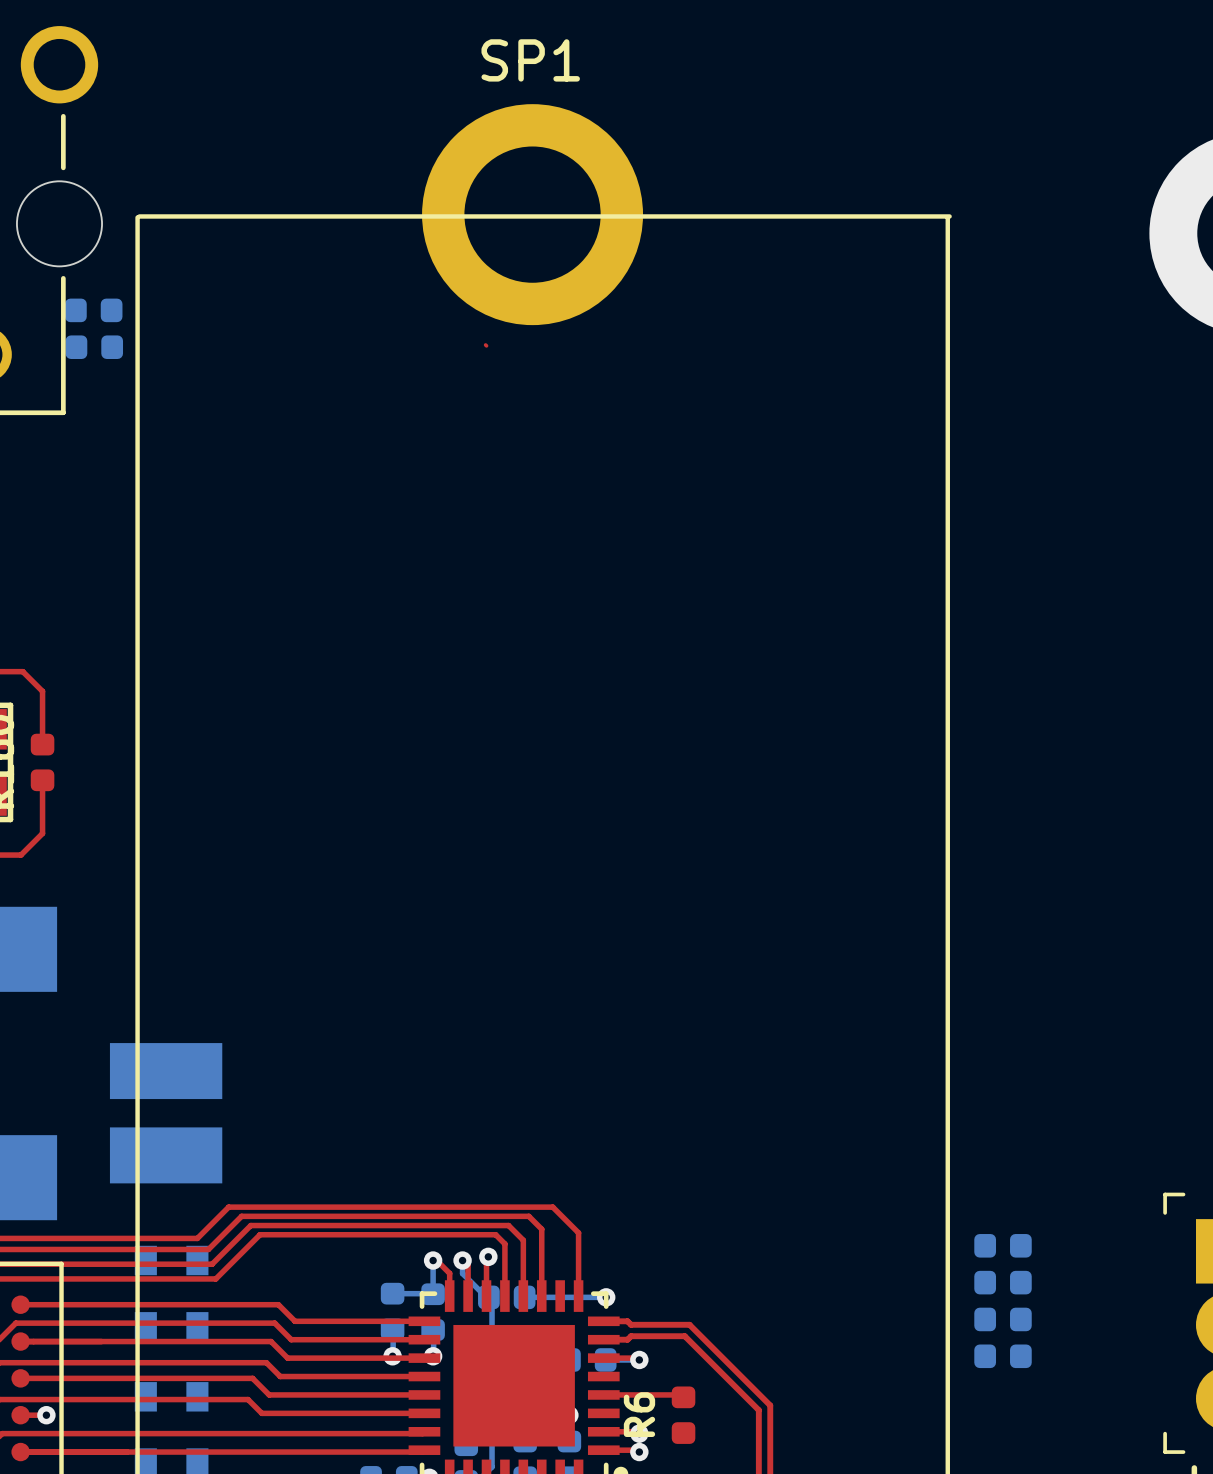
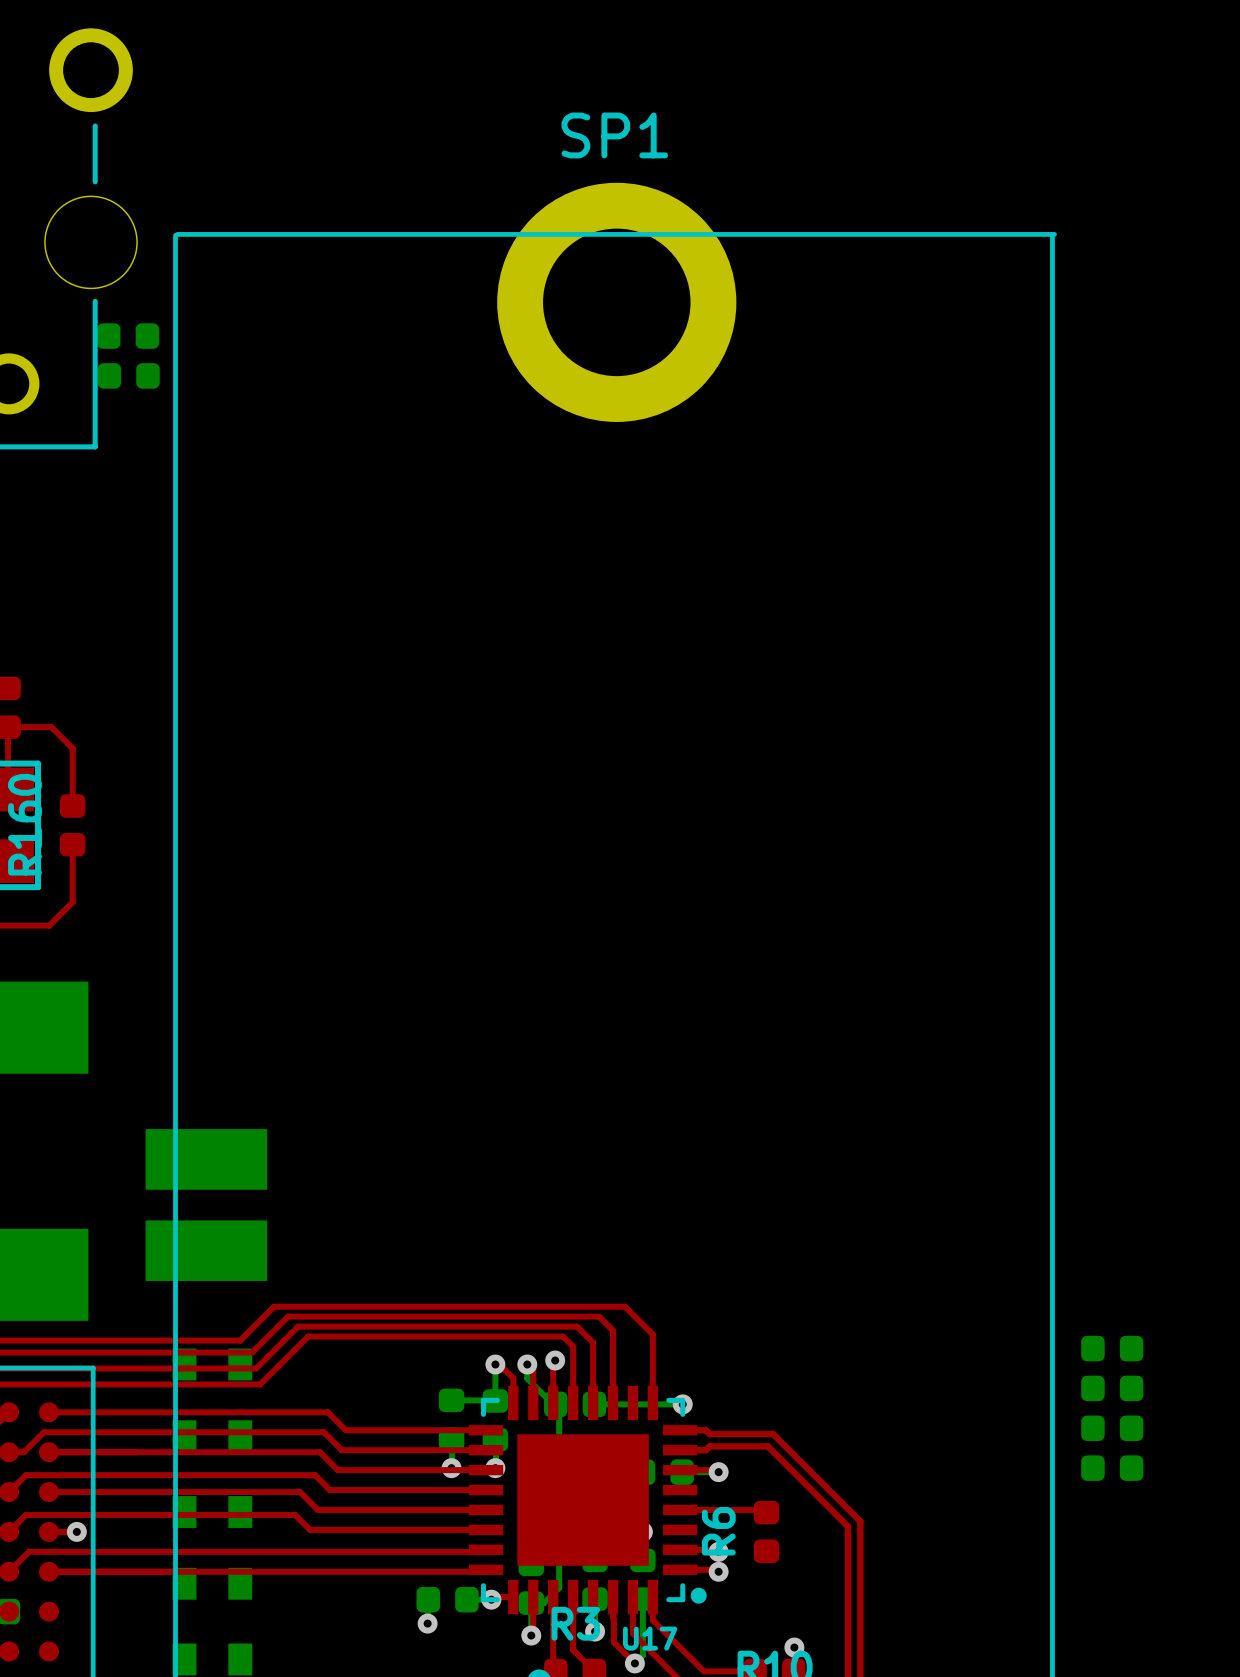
SP1 position: (532, 214) -> (616, 302)

